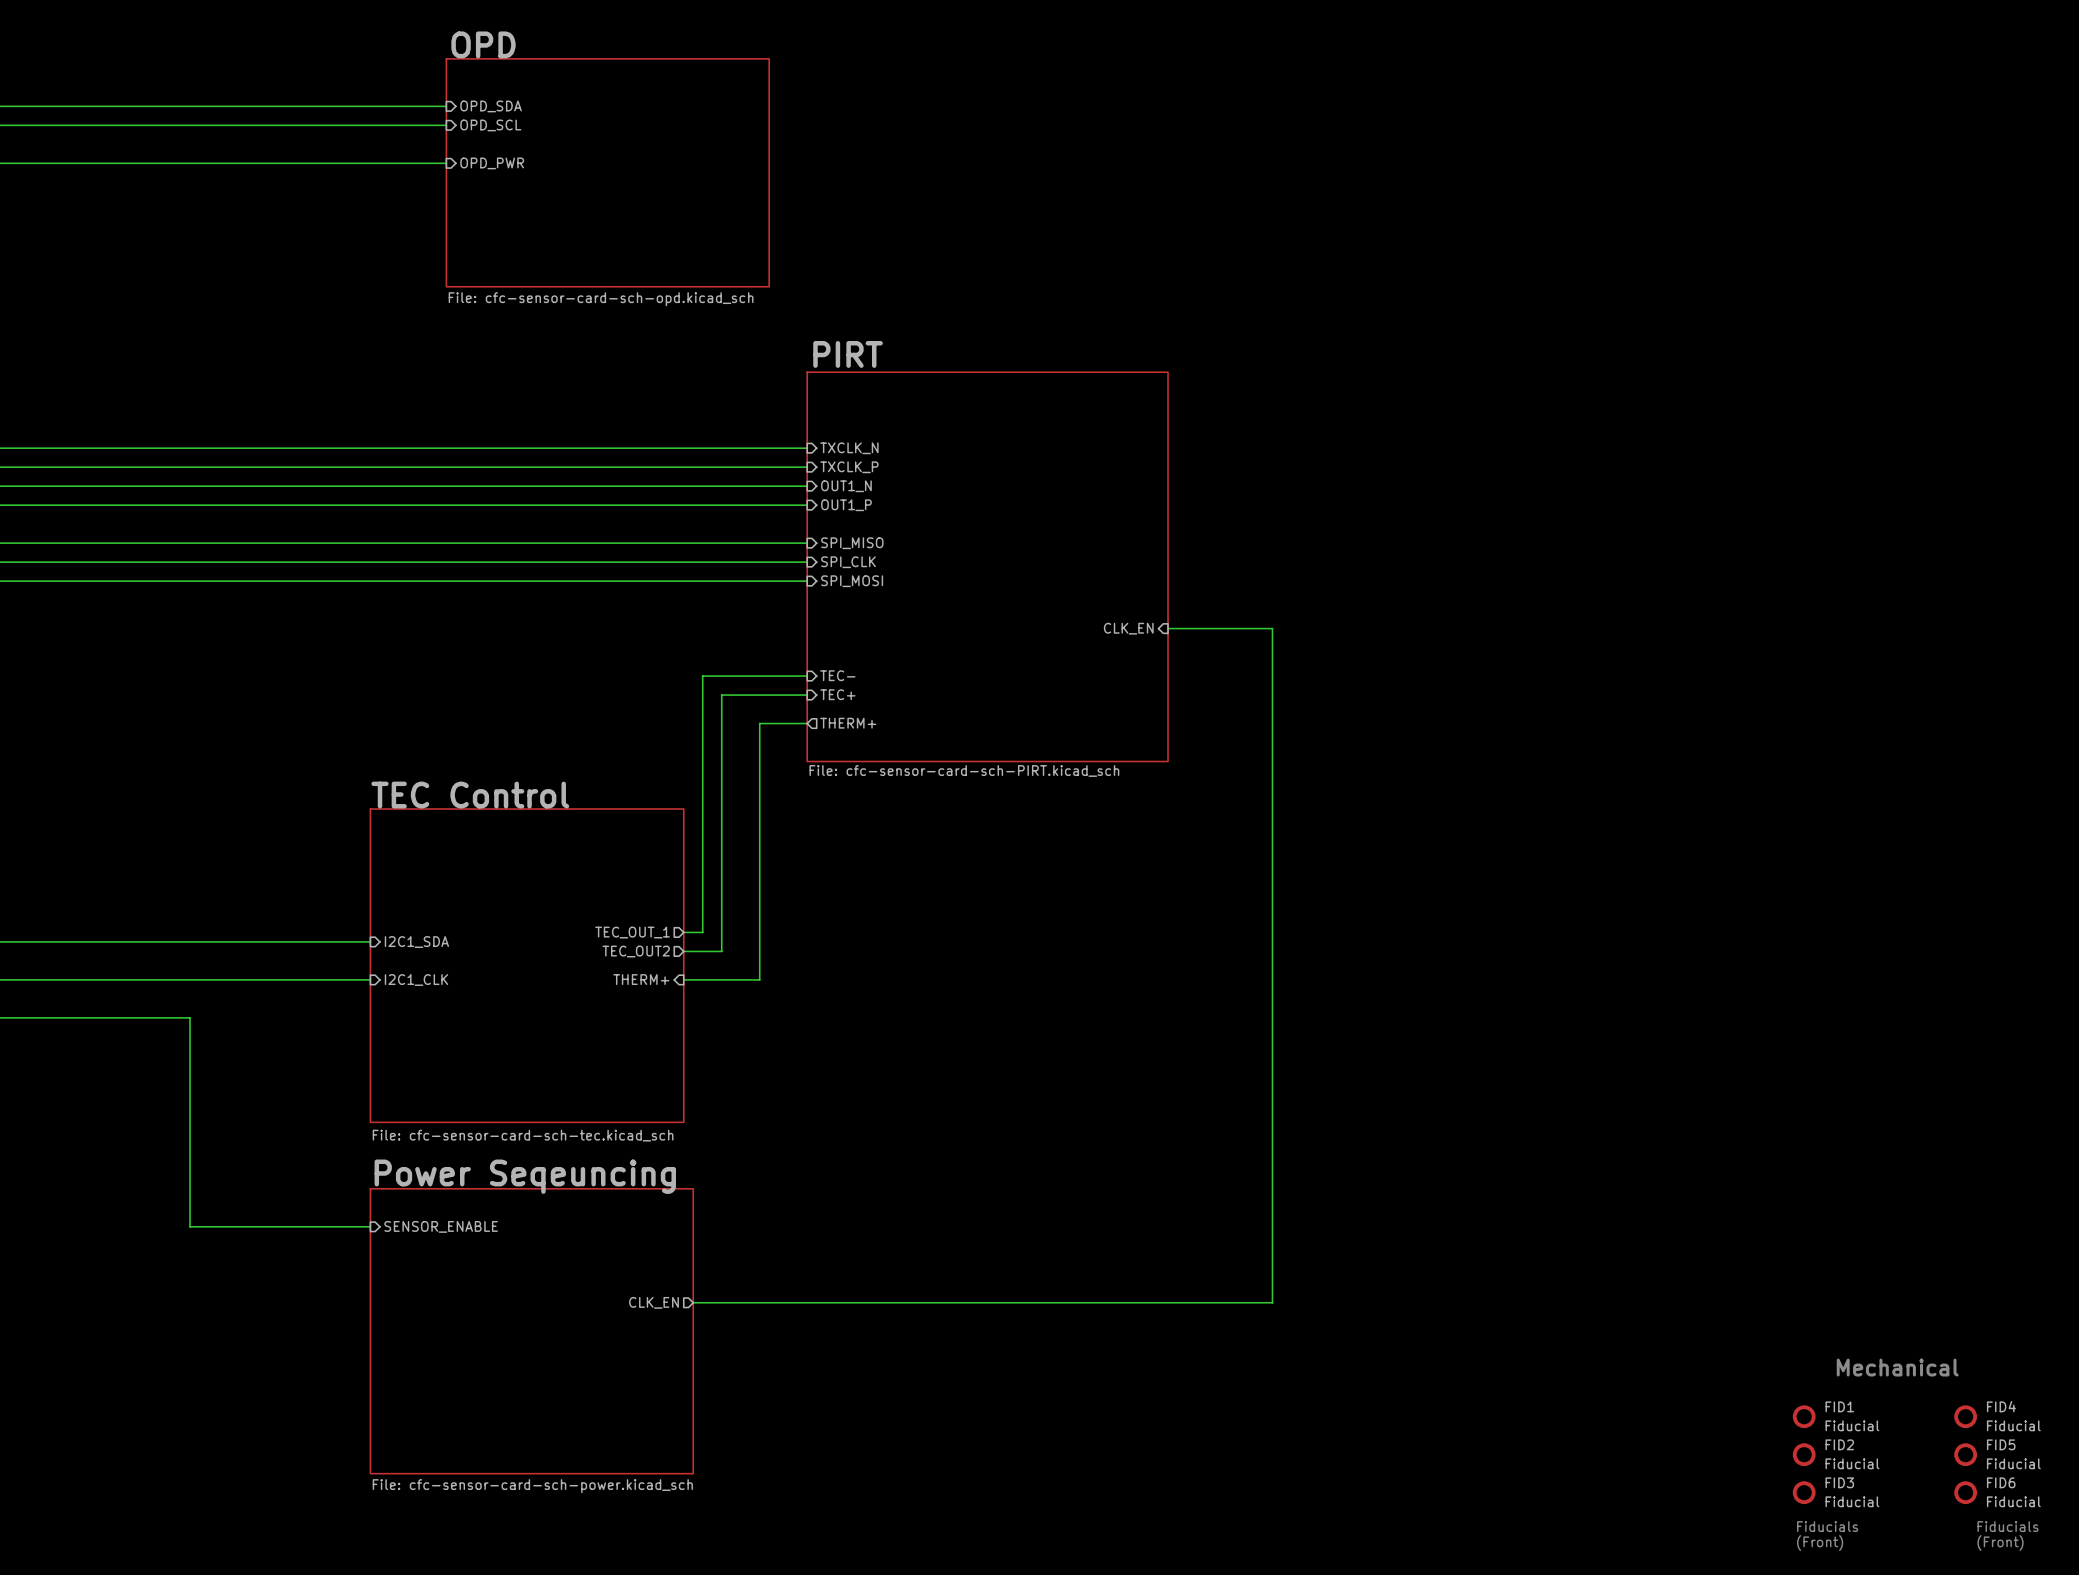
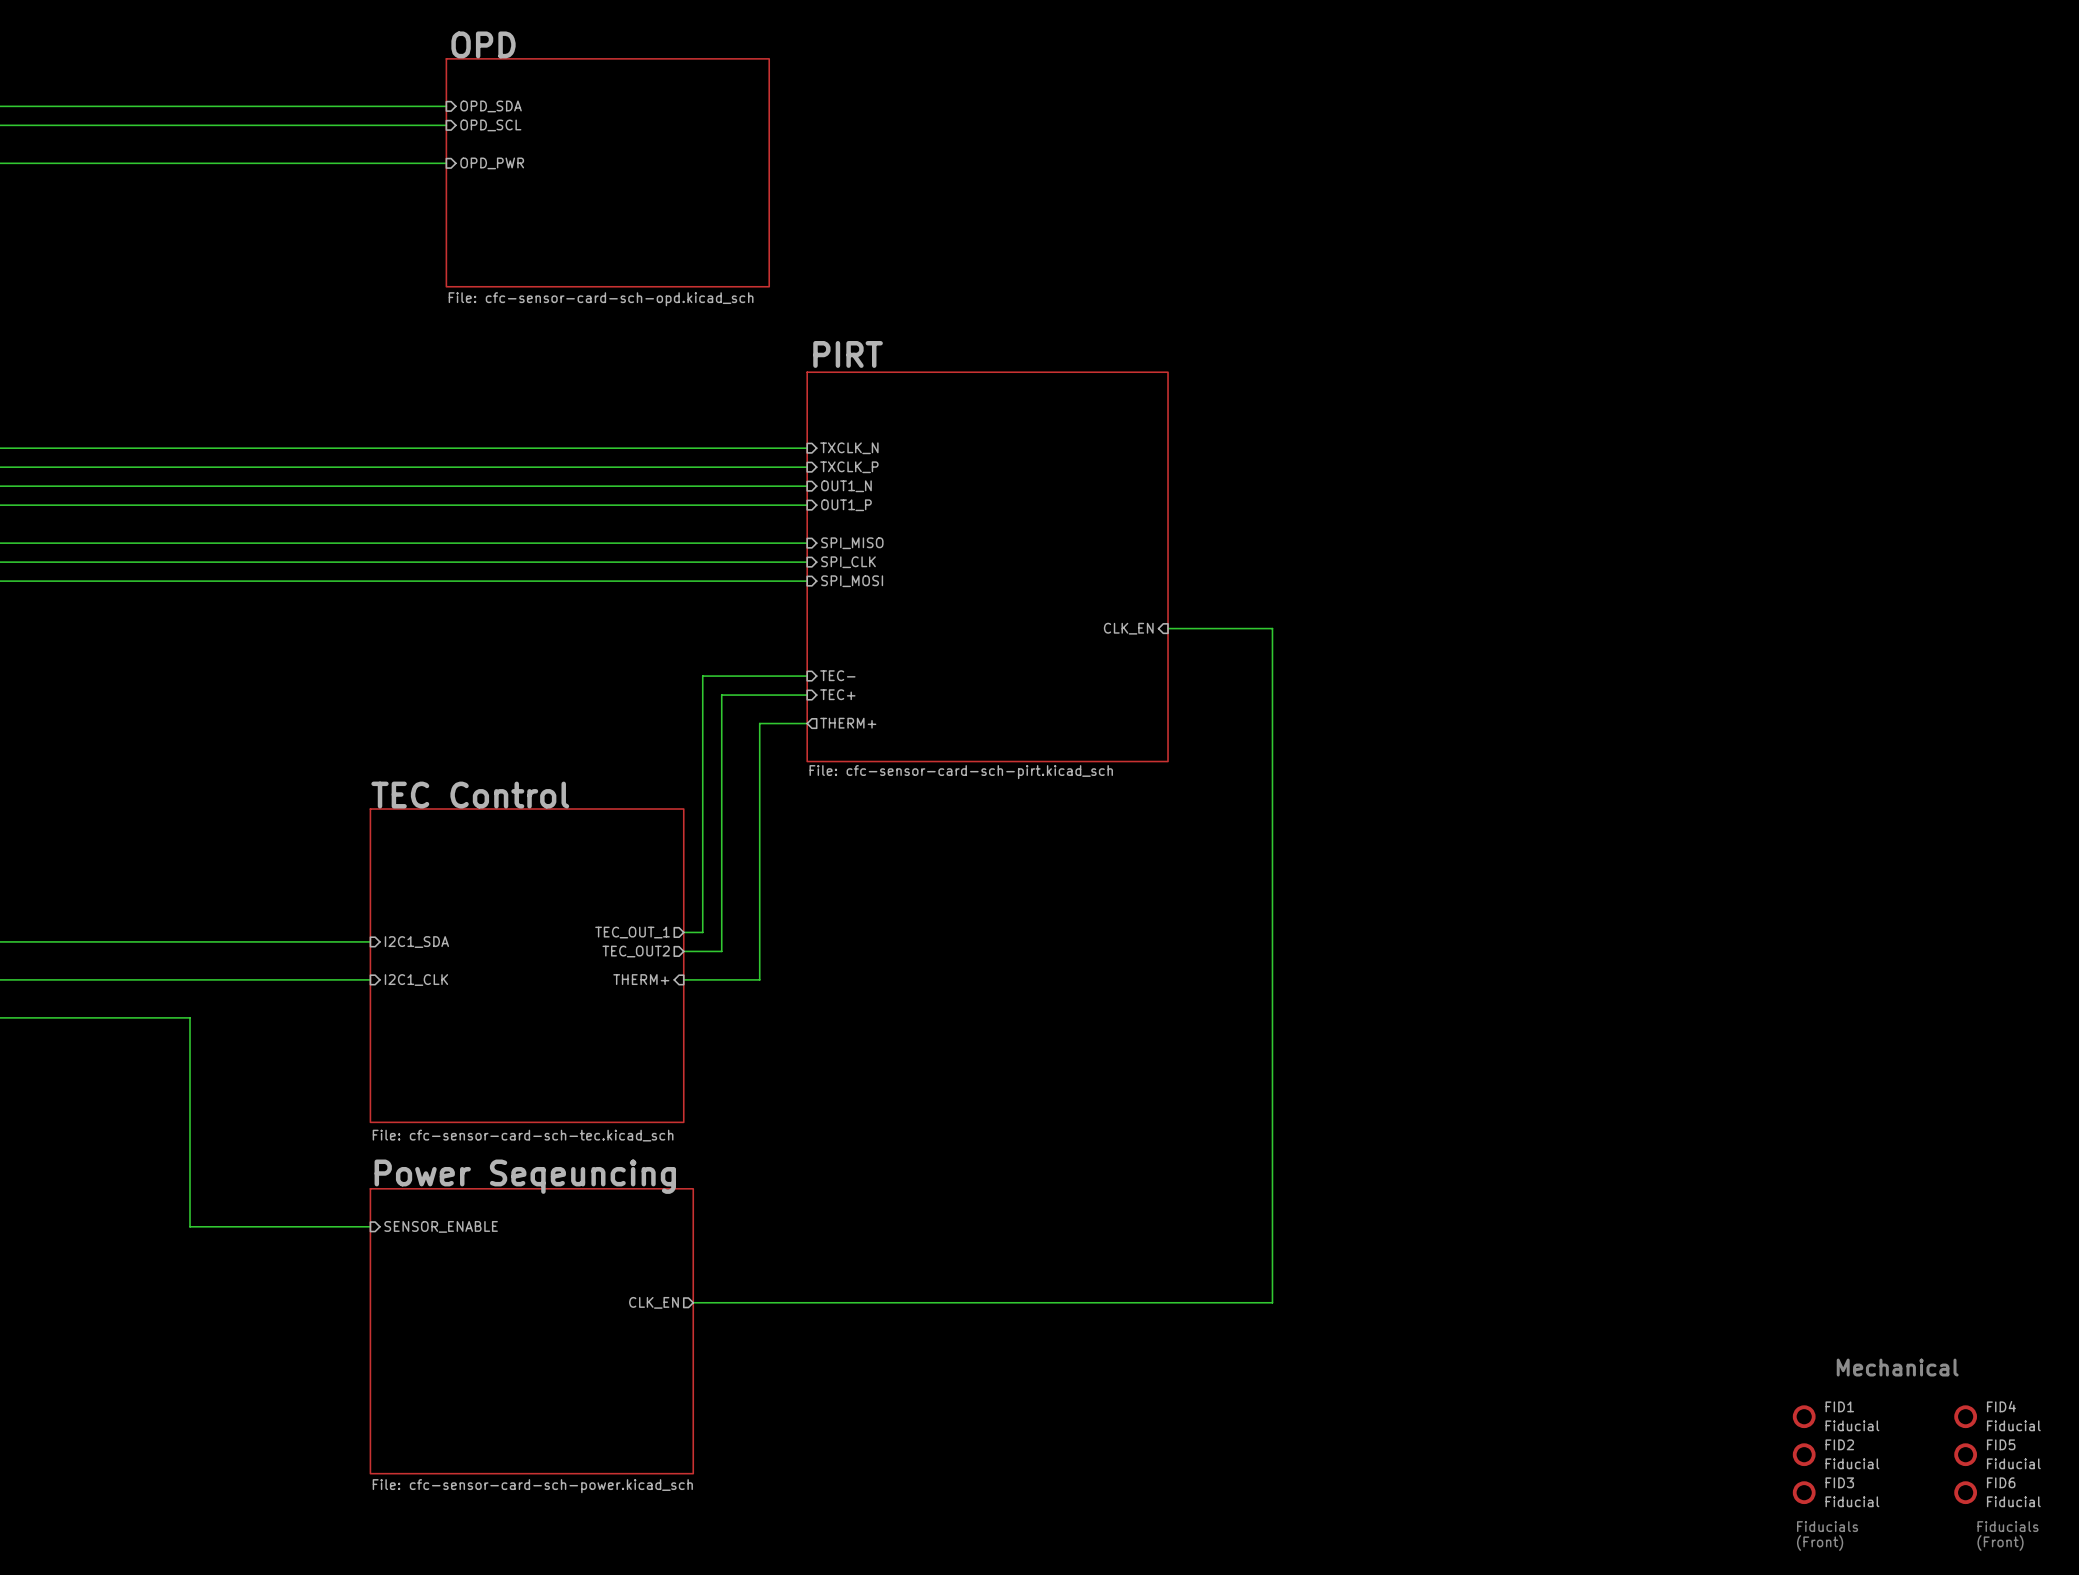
sheet PIRT value: File: cfc-sensor-card-sch-PIRT.kicad_sch (964, 770) -> File: cfc-sensor-card-sch-pirt.kicad_sch (961, 772)

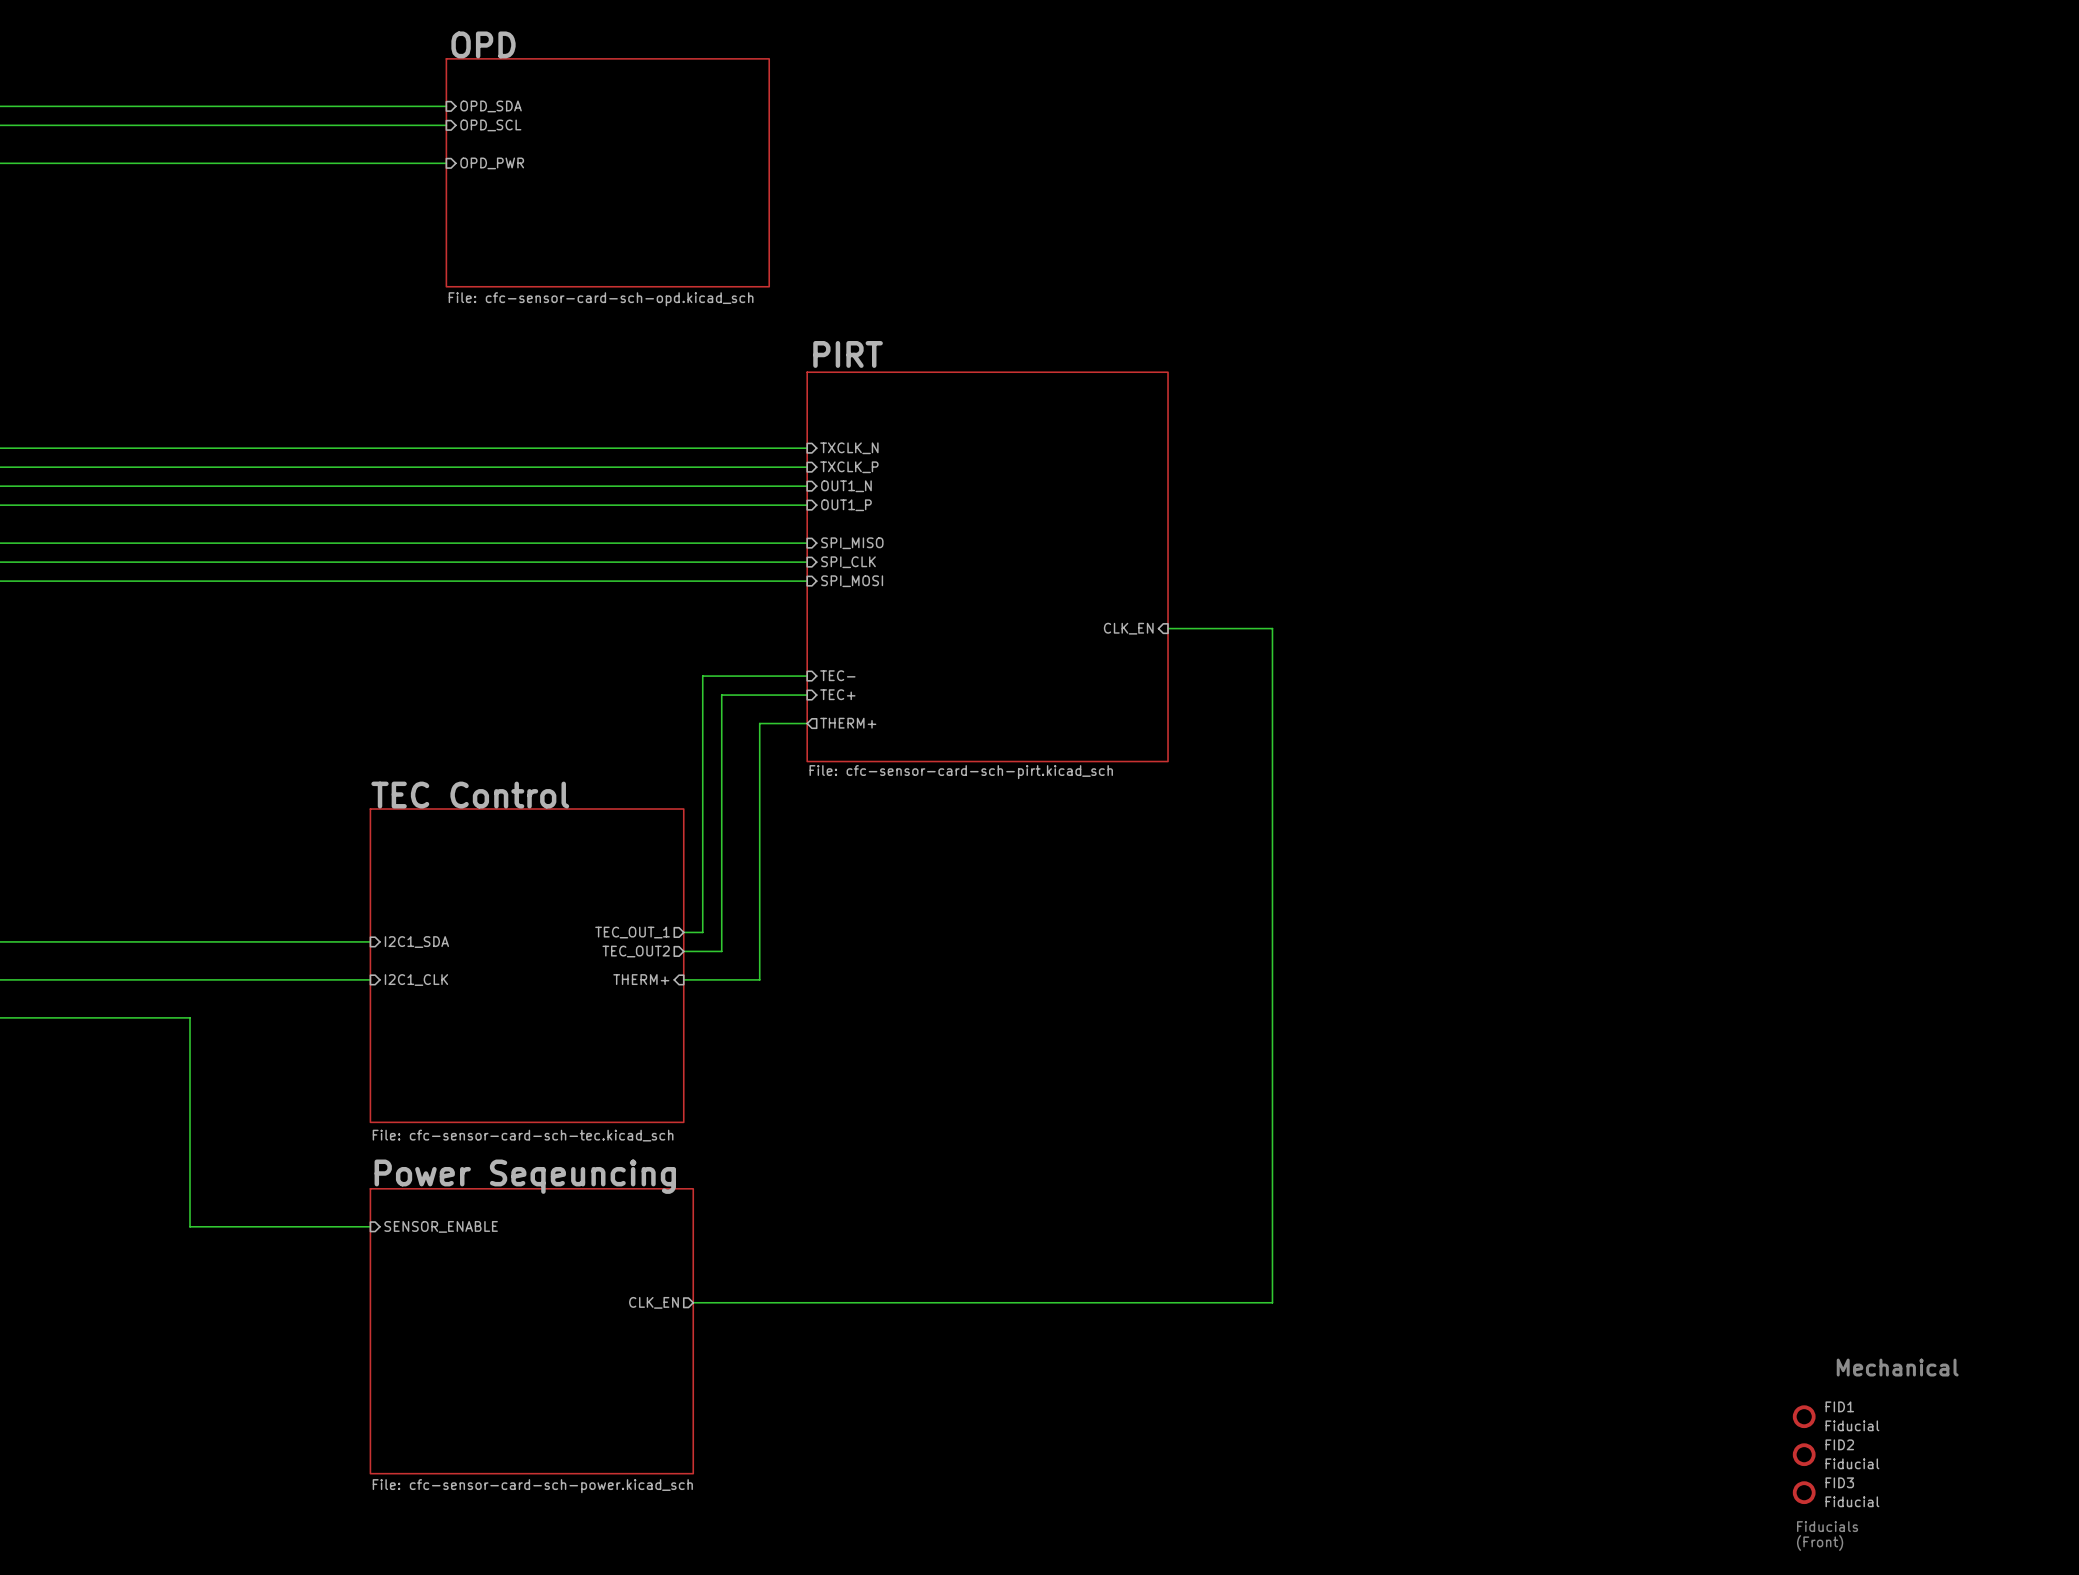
FID4: Fiducial (1965, 1416) -> none
FID5: Fiducial (1965, 1454) -> none
FID6: Fiducial (1965, 1492) -> none
text: Fiducials (2007, 1526) -> none
text: (Front) (2000, 1542) -> none

